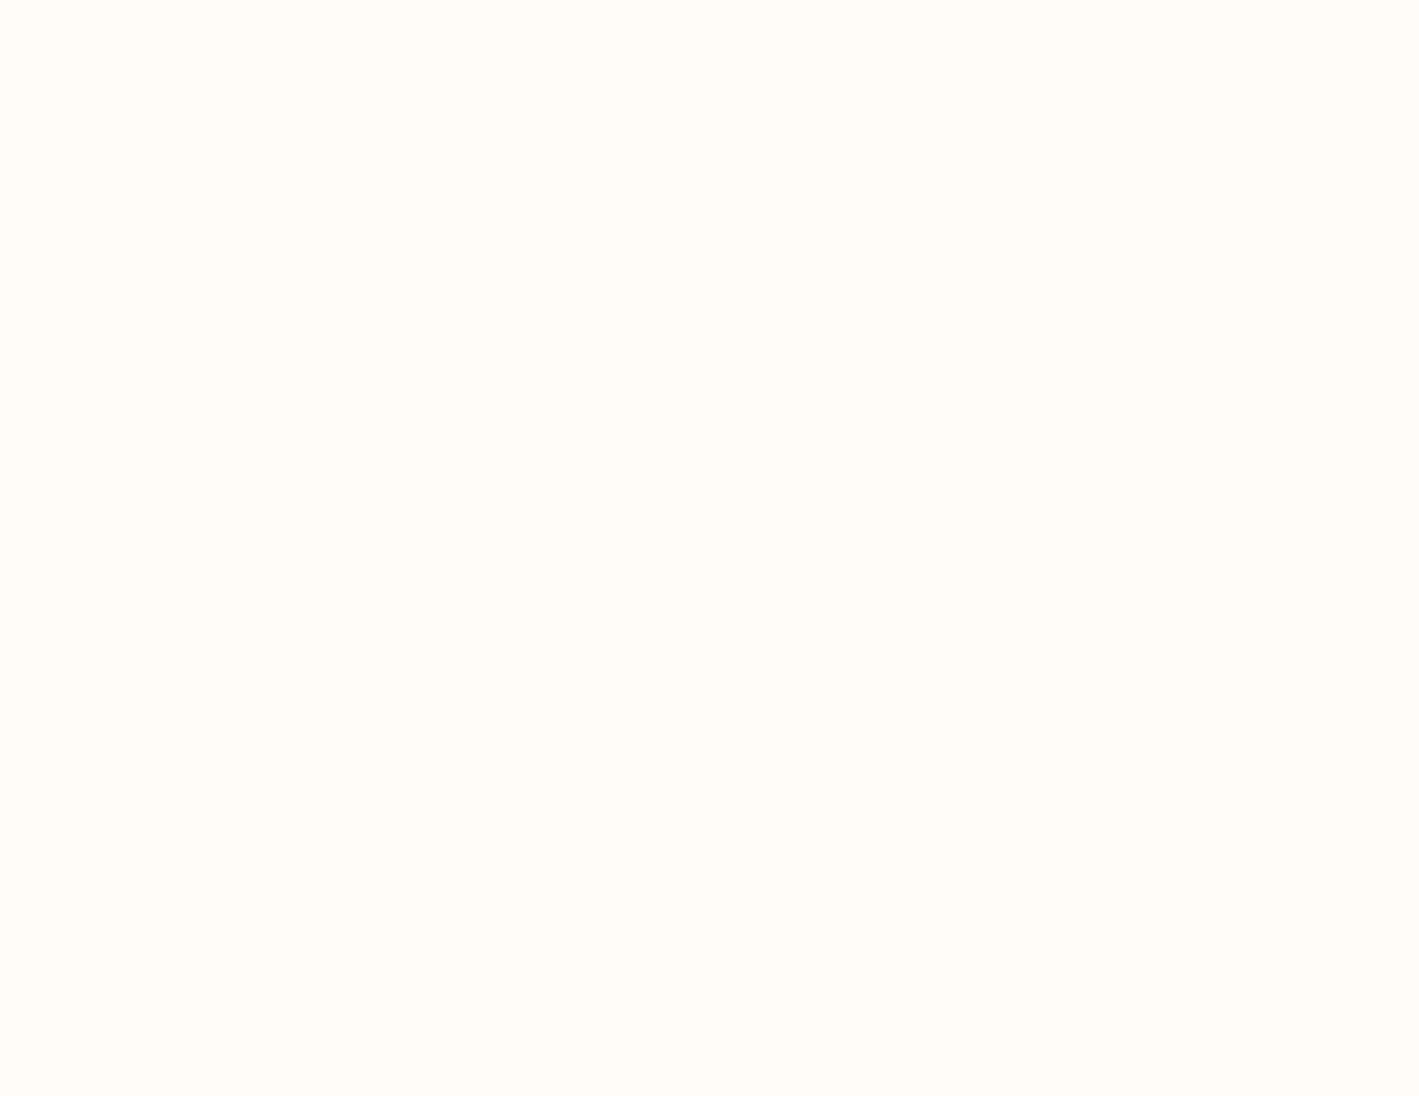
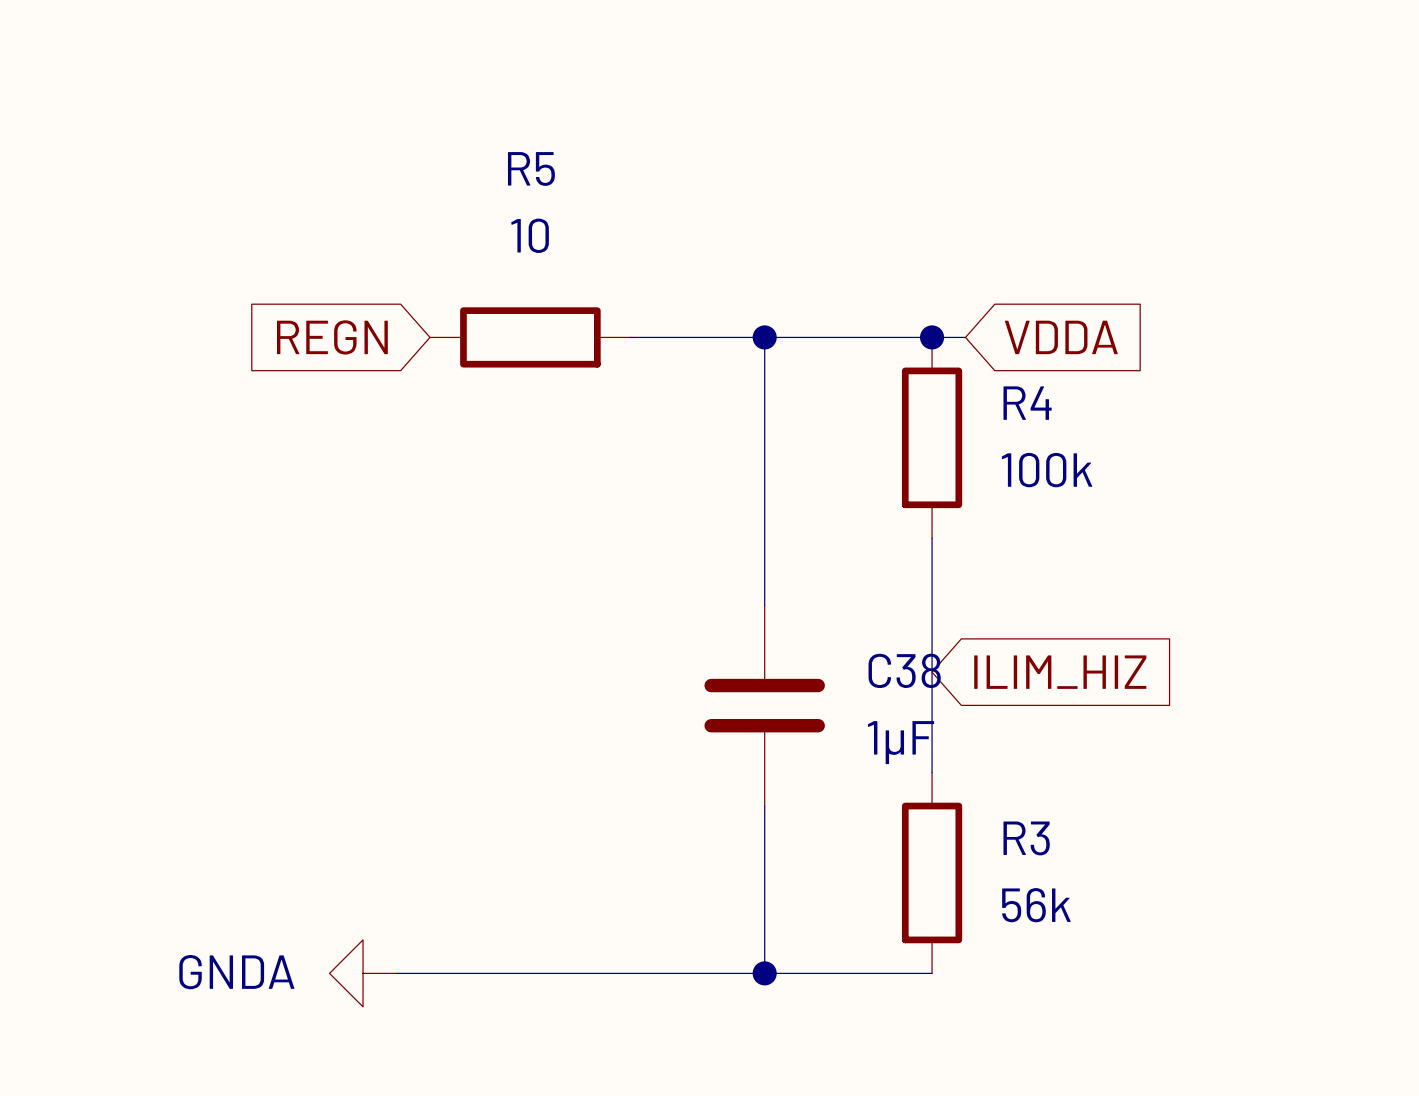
global label: none -> REGN (332, 337)
R5: none -> 10 (530, 337)
wire: none -> (630, 337) (965, 337)
wire: none -> (764, 337) (764, 605)
junction: none -> (764, 337)
junction: none -> (932, 337)
global label: none -> VDDA (1061, 337)
R4: none -> 100k (932, 437)
wire: none -> (932, 538) (932, 772)
global label: none -> ILIM_HIZ (1060, 672)
C38: none -> 1µF (764, 705)
wire: none -> (764, 806) (764, 973)
R3: none -> 56k (932, 872)
power symbol: none -> GNDA (363, 973)
wire: none -> (396, 973) (932, 973)
junction: none -> (764, 973)

